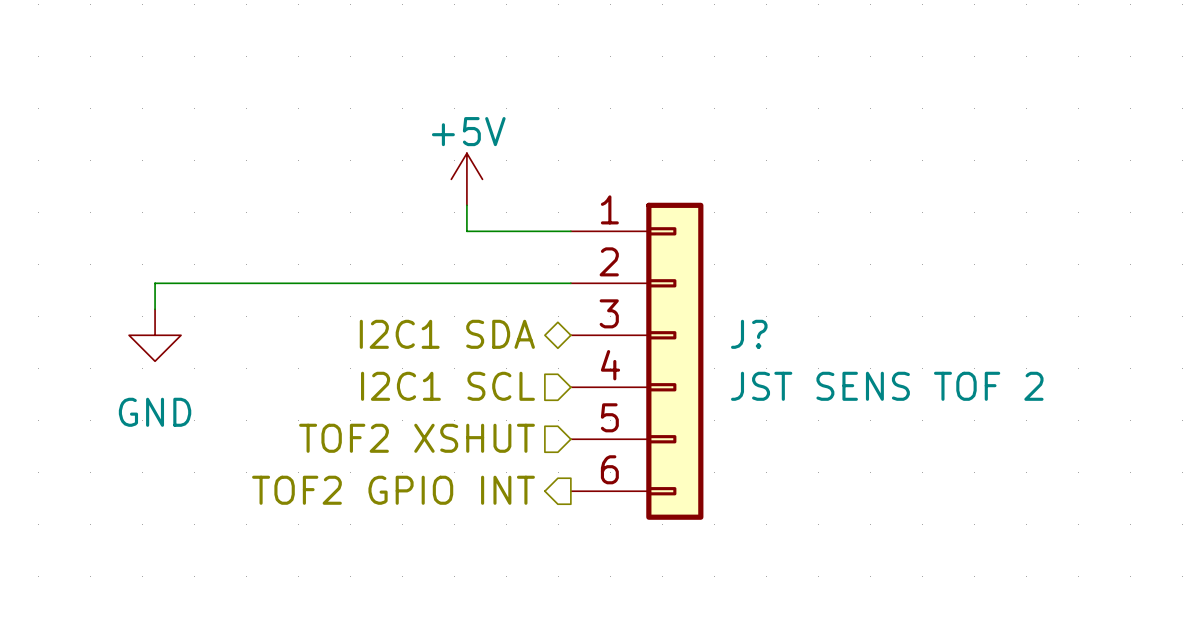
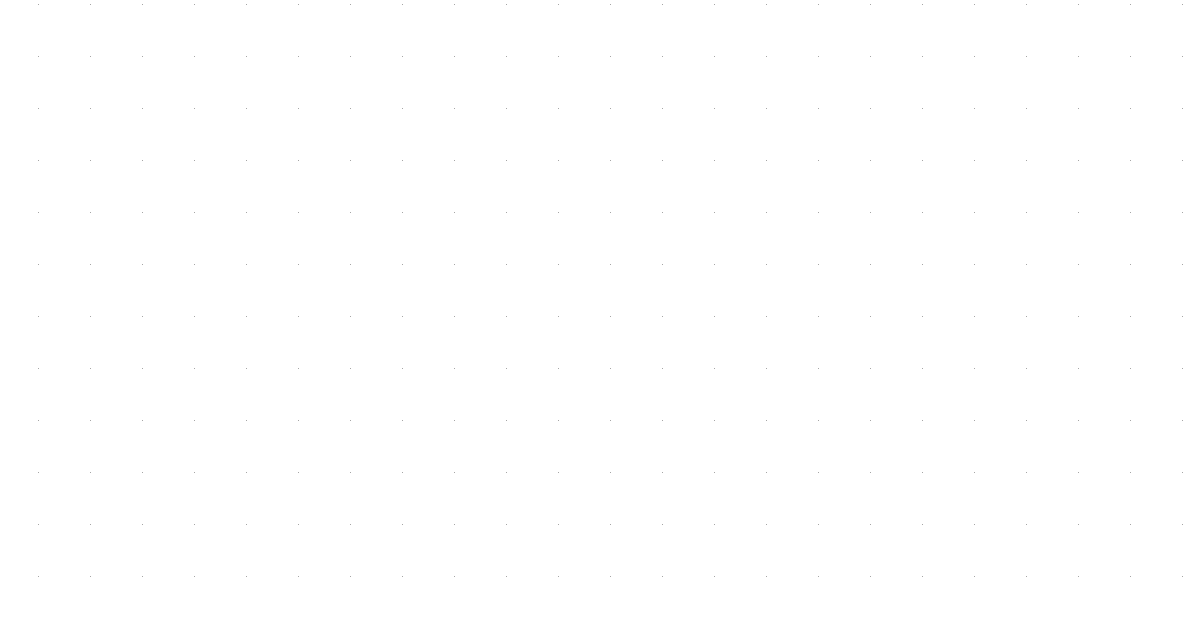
power symbol: +5V (466, 179) -> none
wire: (466, 205) (466, 231) (570, 231) -> none
wire: (570, 283) (155, 283) (155, 309) -> none
hierarchical label: I2C1 SDA (447, 334) -> none
power symbol: GND (155, 335) -> none
J?: JST SENS TOF 2 (637, 361) -> none
hierarchical label: I2C1 SCL (447, 386) -> none
hierarchical label: TOF2 XSHUT (417, 438) -> none
hierarchical label: TOF2 GPIO INT (393, 490) -> none

